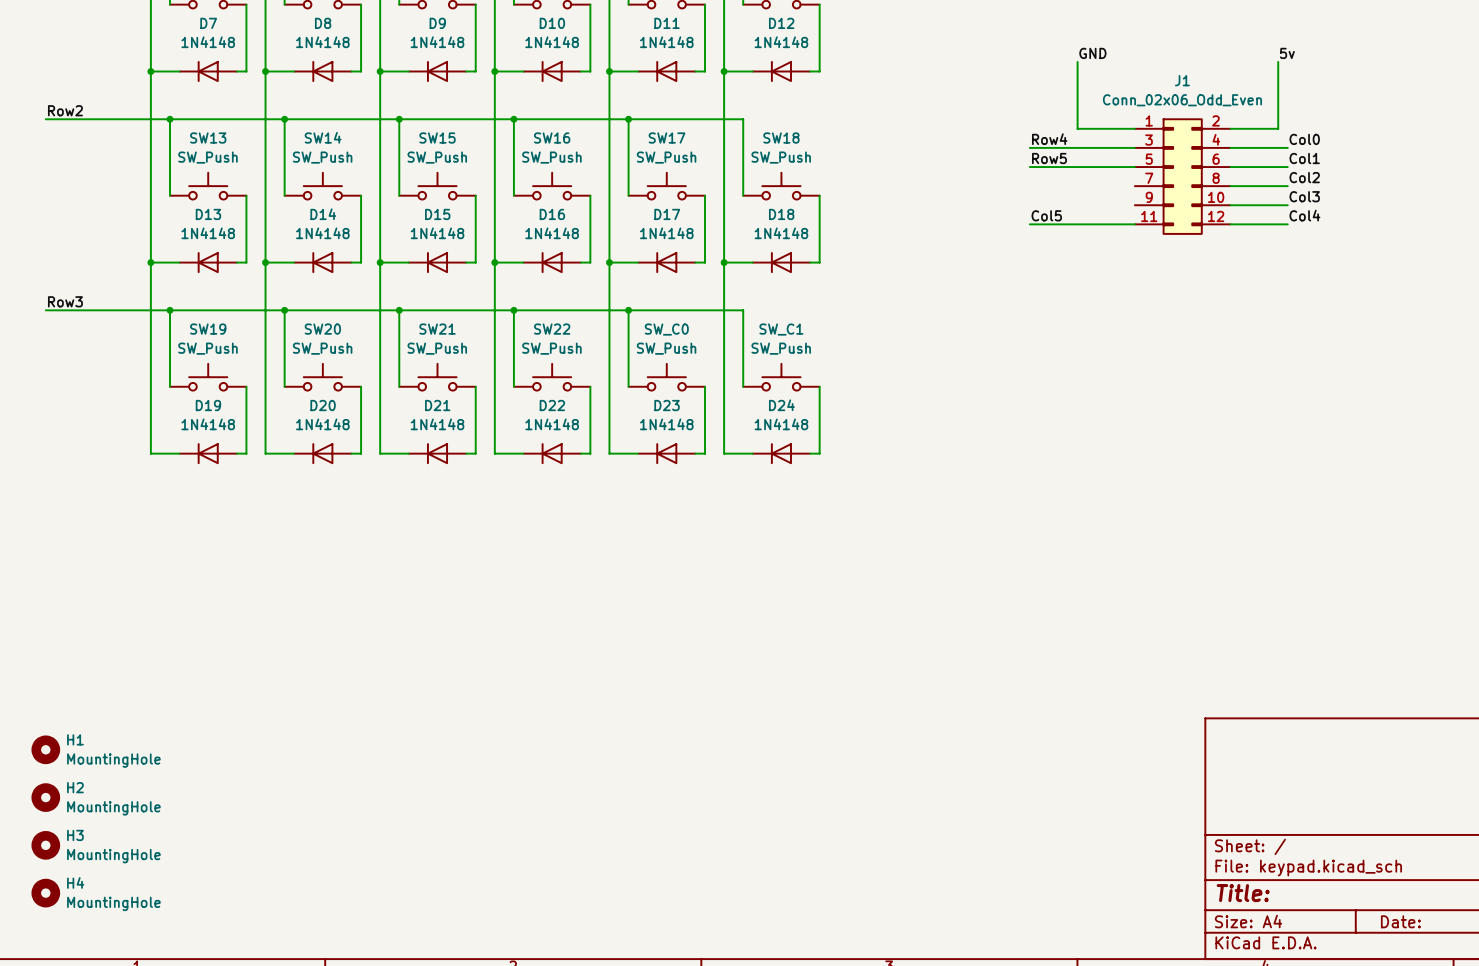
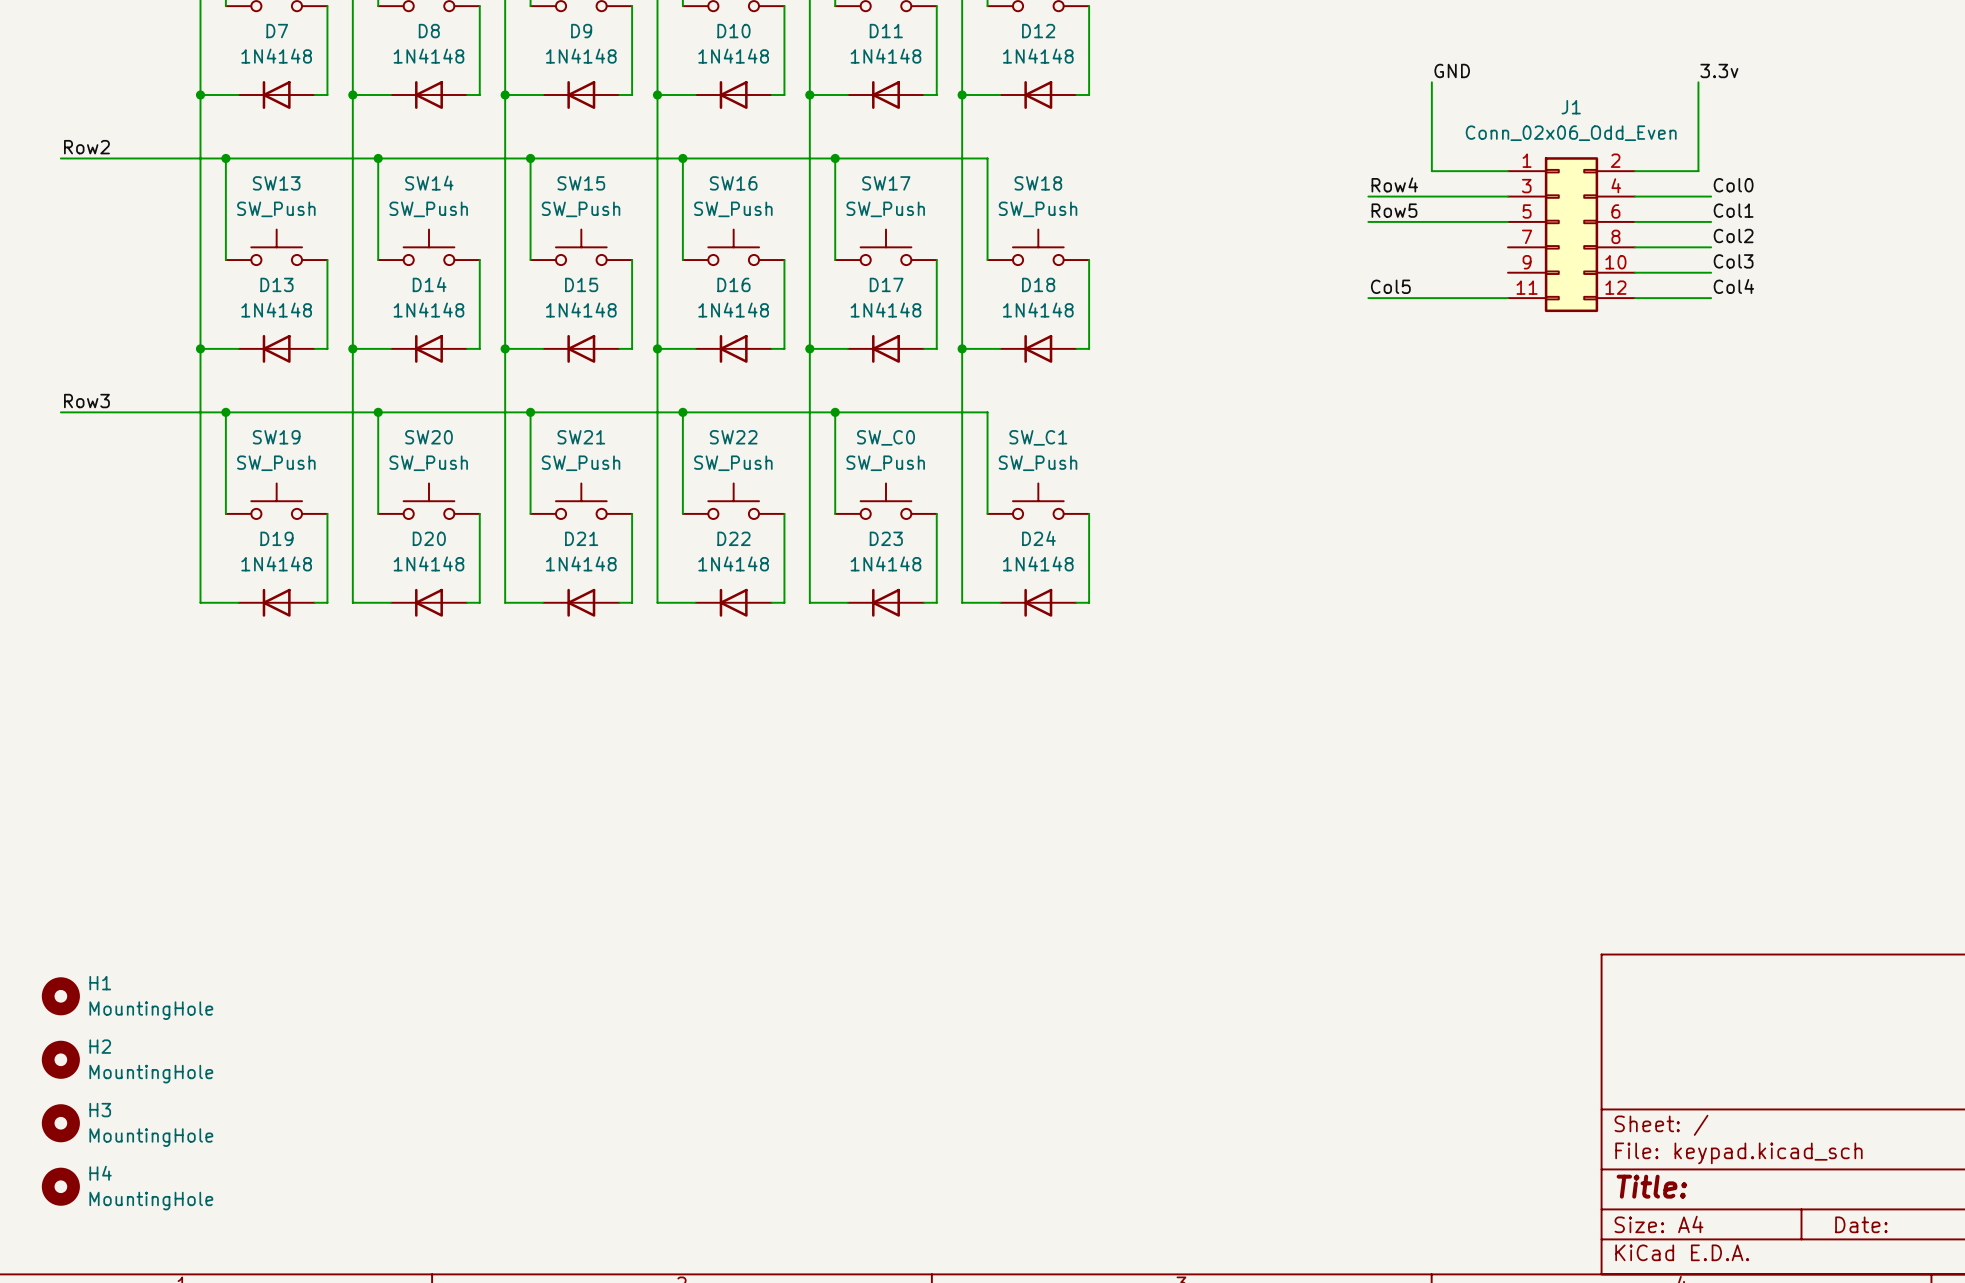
label: 5v (1287, 53) -> 3.3v (1719, 70)

